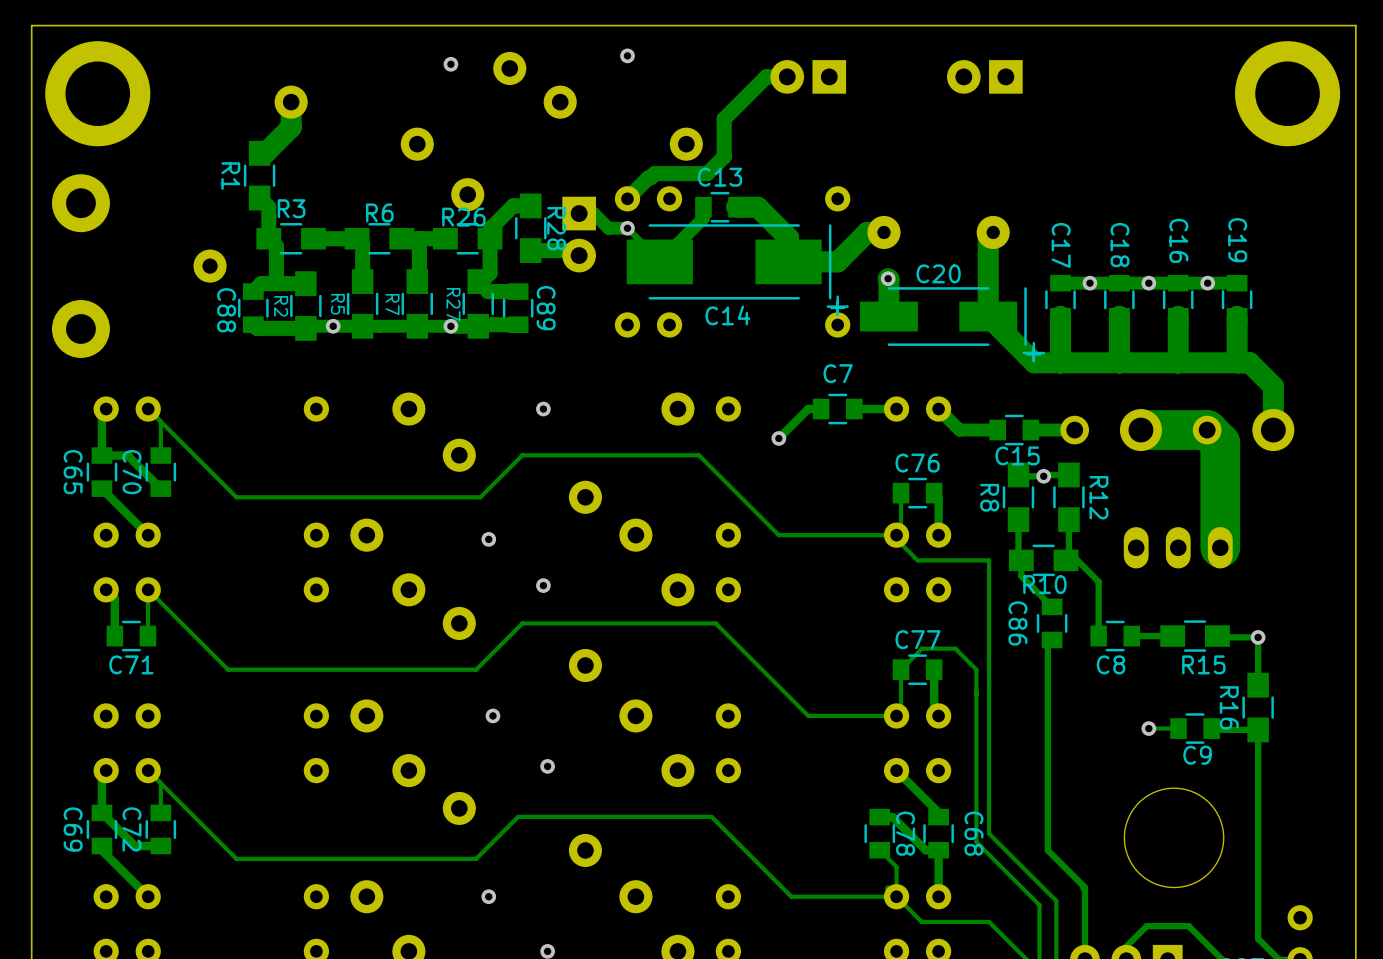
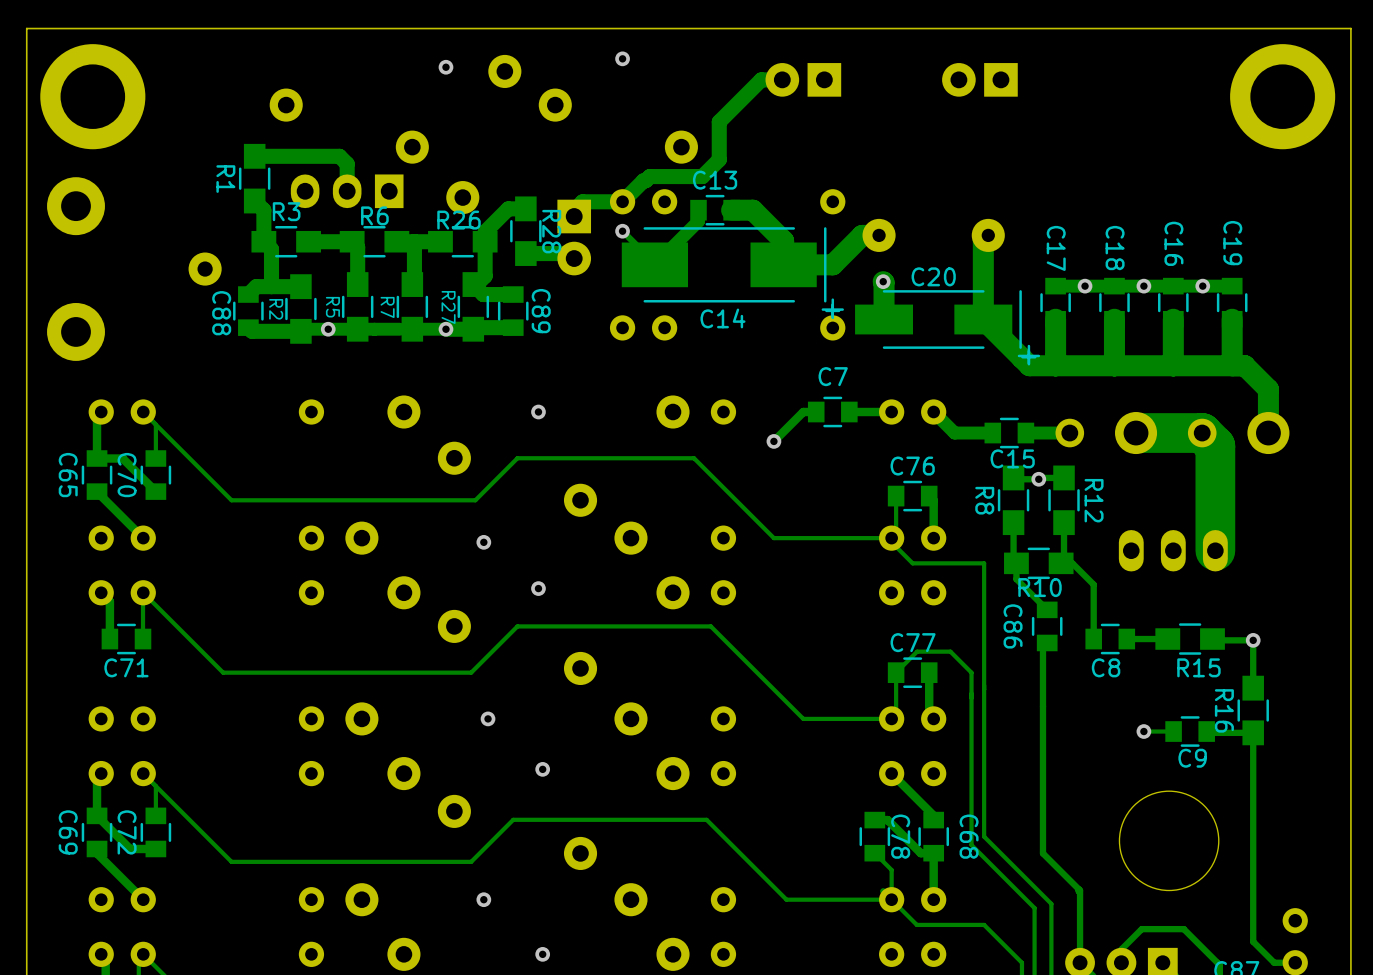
track: (291, 102) (291, 127) (265, 153) -> (347, 191) (347, 163) (339, 156) (260, 156)
part: none -> (347, 191)
track: none -> (622, 201) (582, 201) (574, 210)
track: (579, 213) (593, 213) (608, 228) (627, 228) -> none

